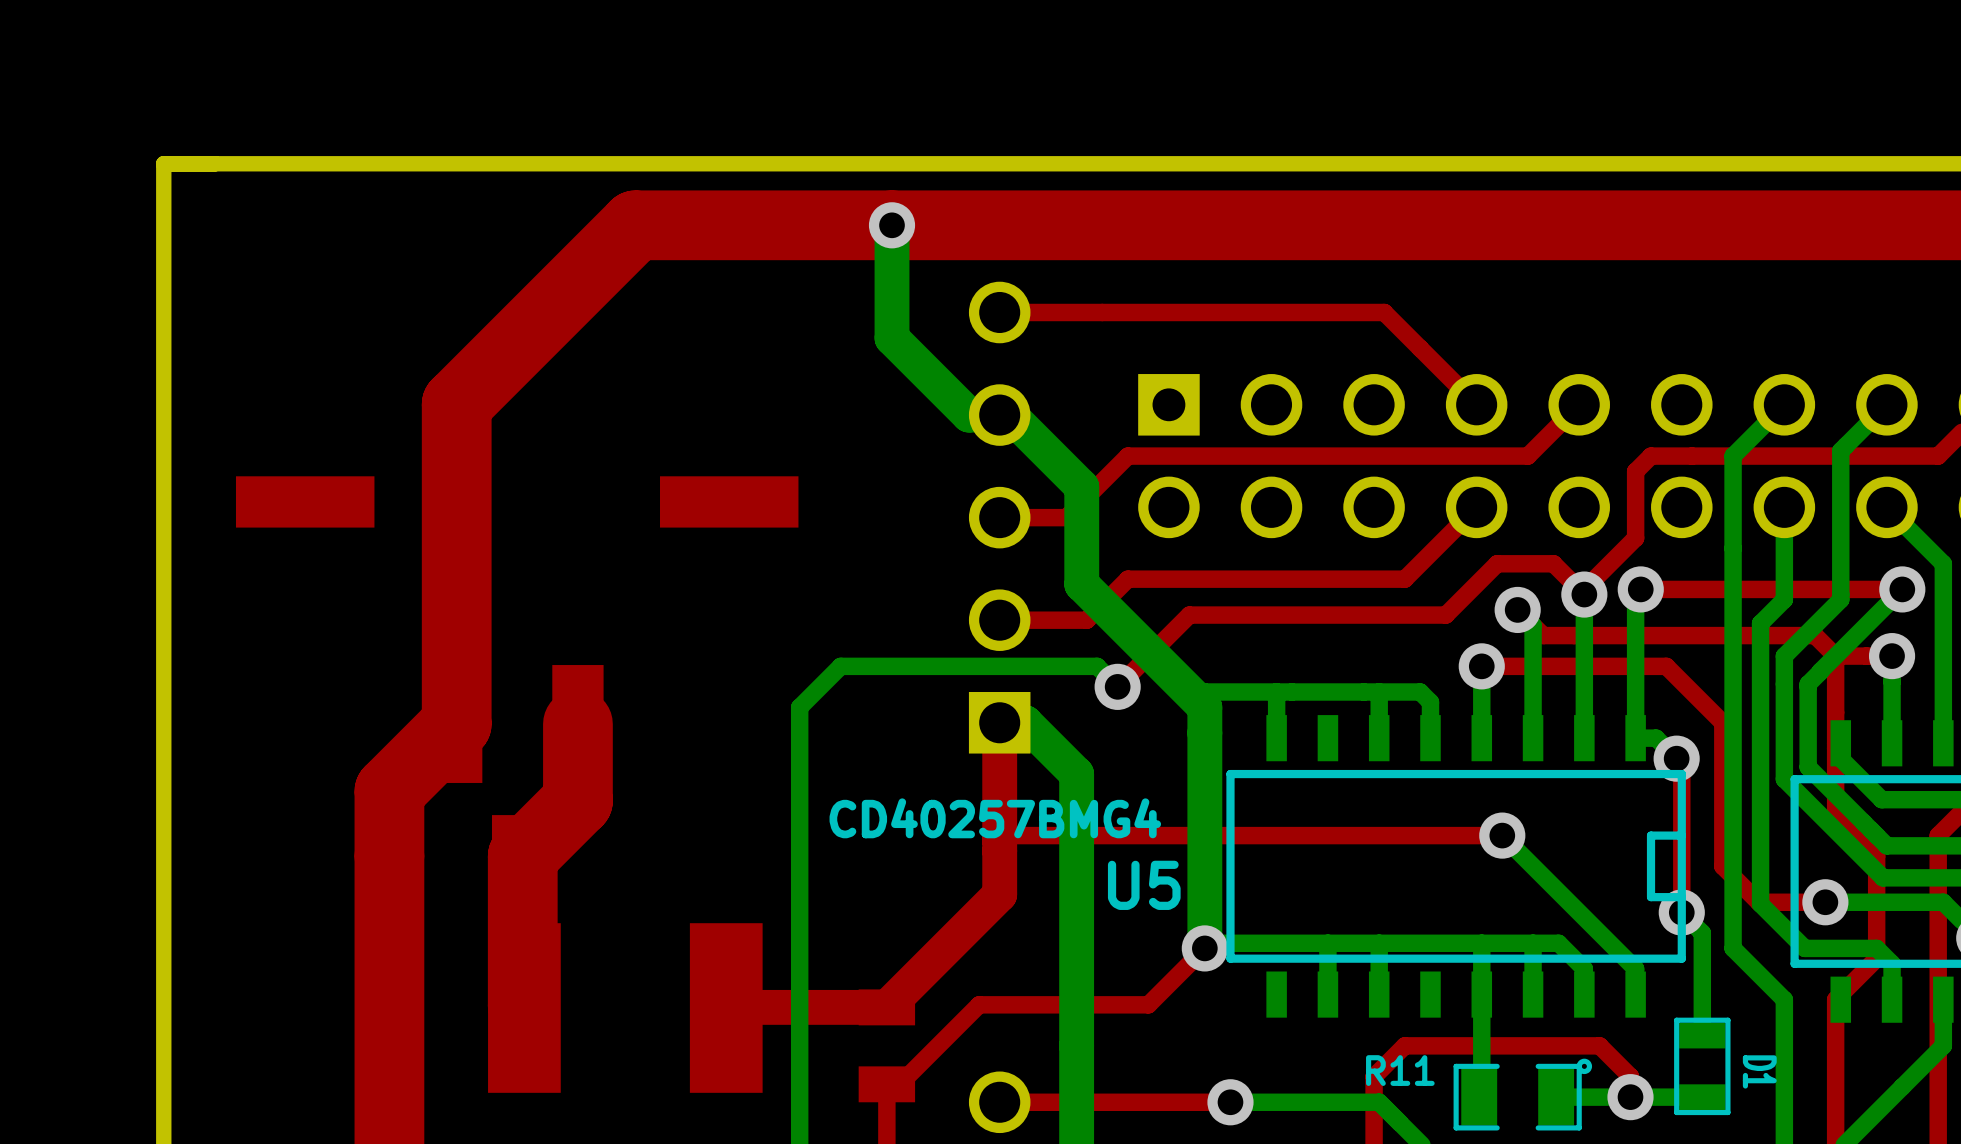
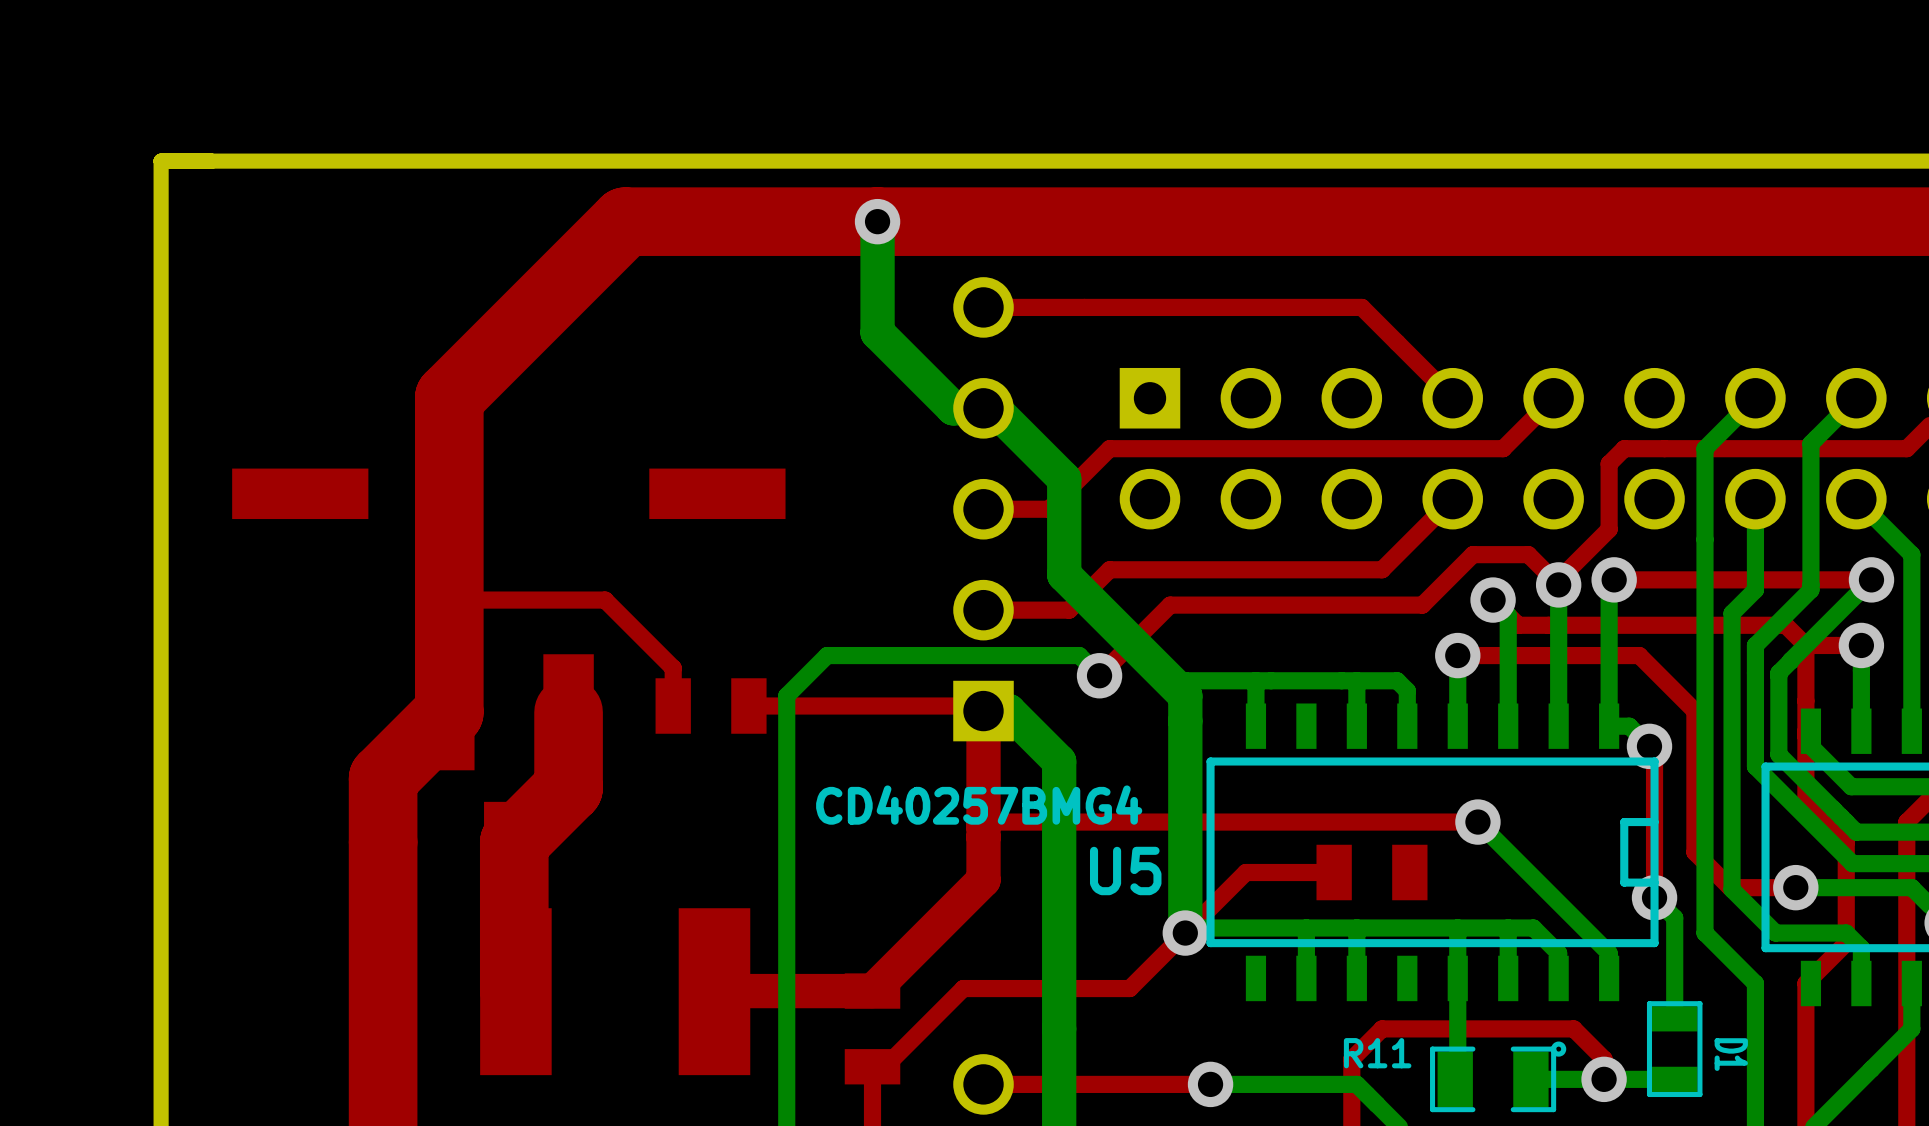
top track: none -> (449, 600) (605, 600) (673, 668) (673, 706)
part: none -> (711, 706)
top track: none -> (748, 706) (978, 706) (983, 711)
top track: none -> (1334, 872) (1245, 872) (1185, 933)
part: none -> (1371, 872)

